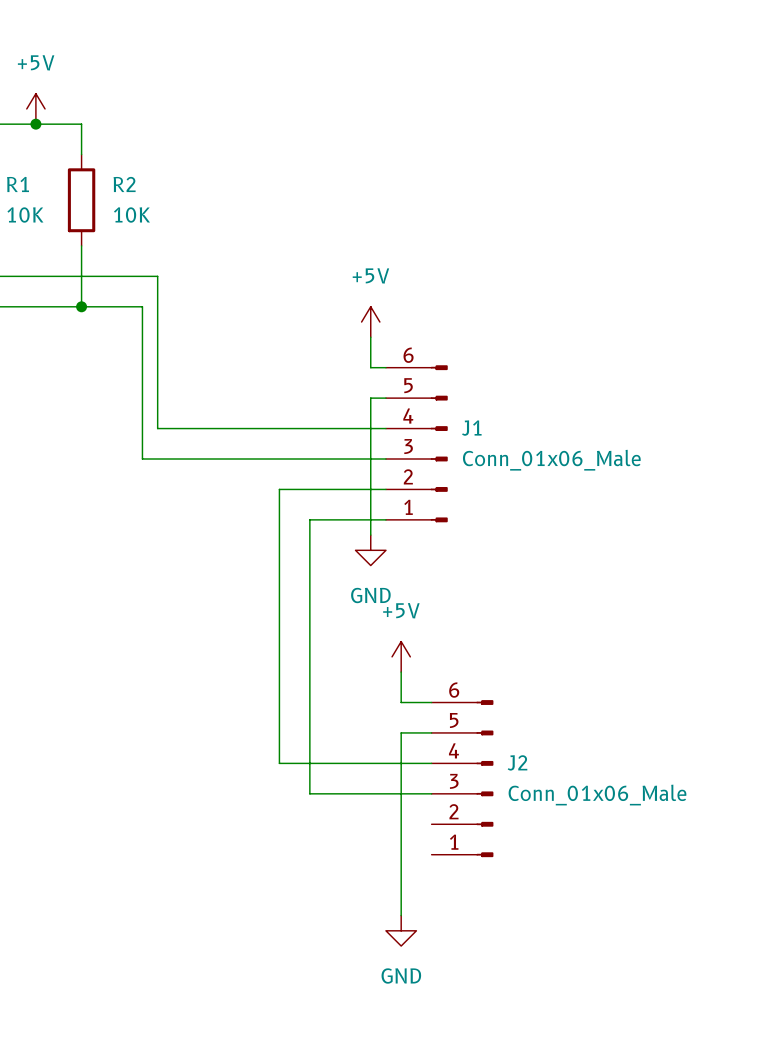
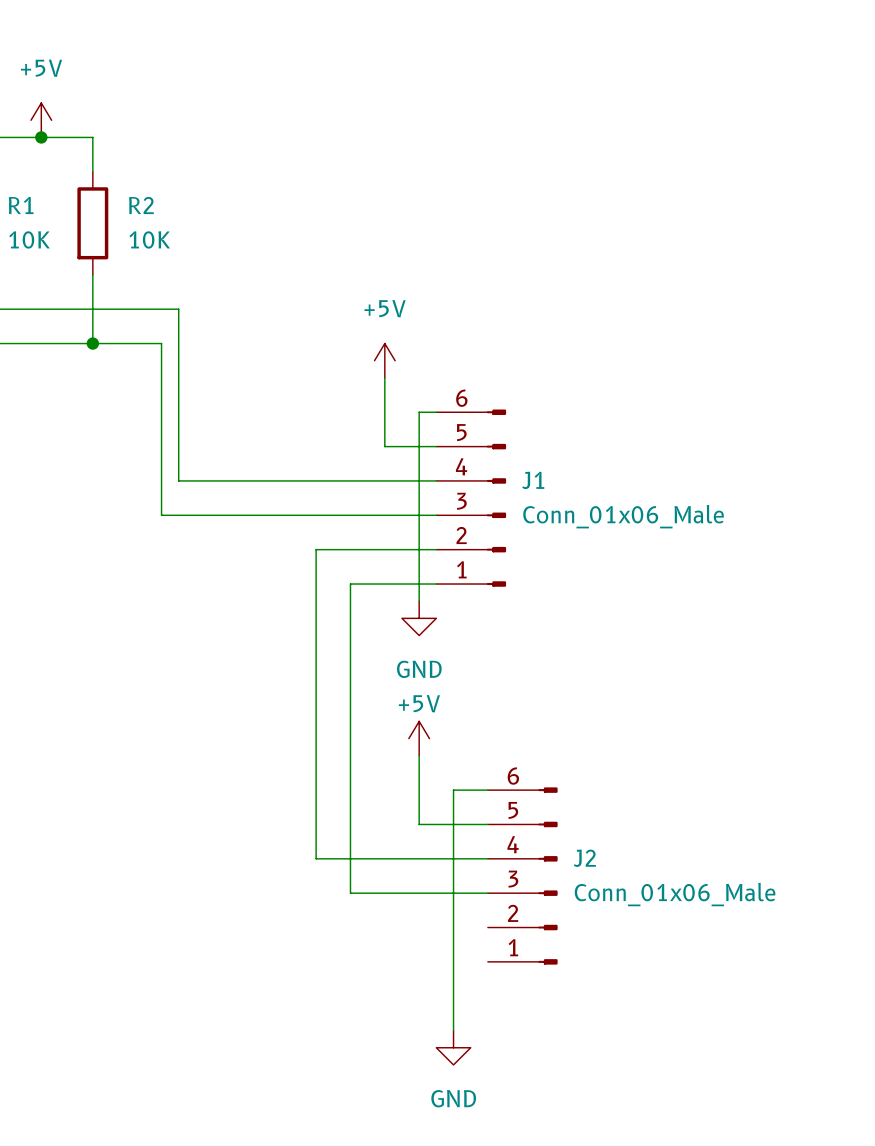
power symbol position: +5V (370, 322) -> +5V (384, 360)
wire: (370, 337) (370, 367) -> (384, 377) (384, 446) (419, 446) (419, 412)
power symbol text position: +5V (401, 610) -> +5V (419, 703)
power symbol position: +5V (401, 656) -> +5V (419, 738)
wire: (401, 672) (401, 702) -> (419, 755) (419, 824) (453, 824) (453, 790)

